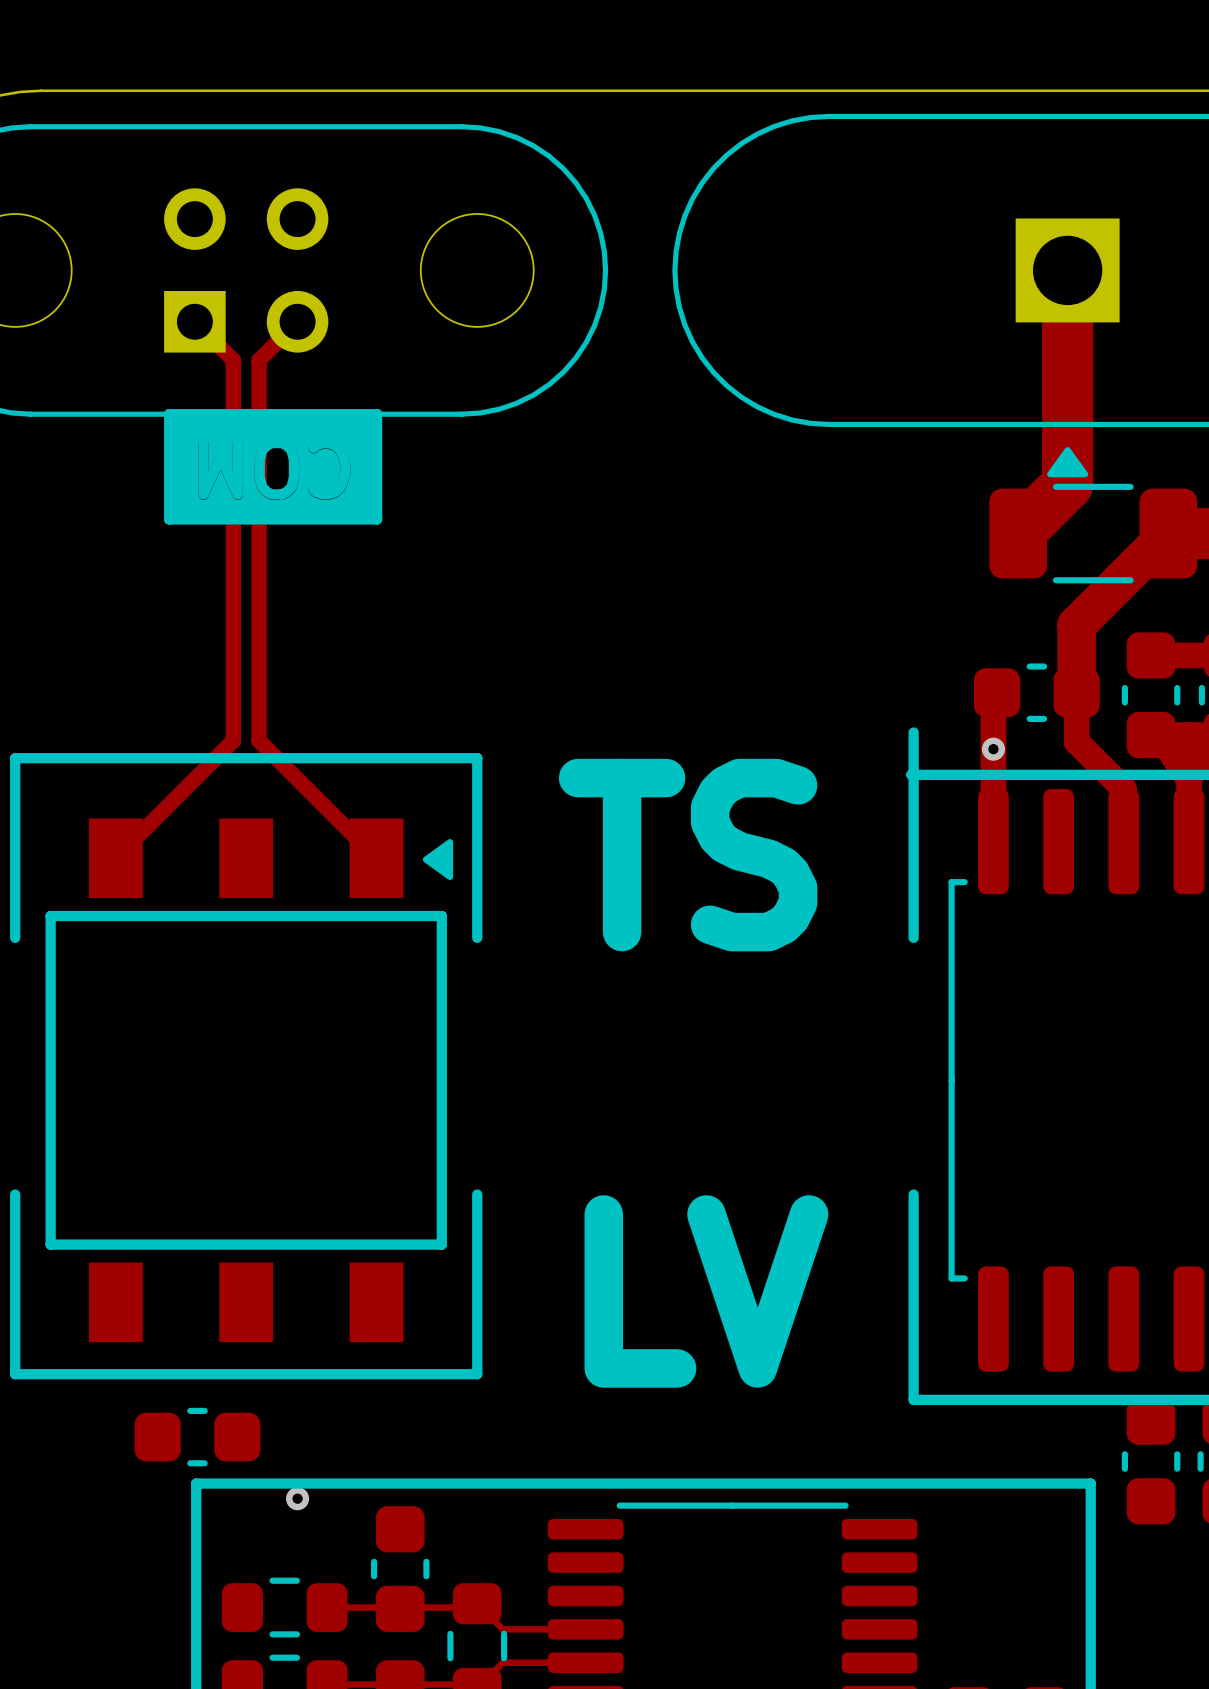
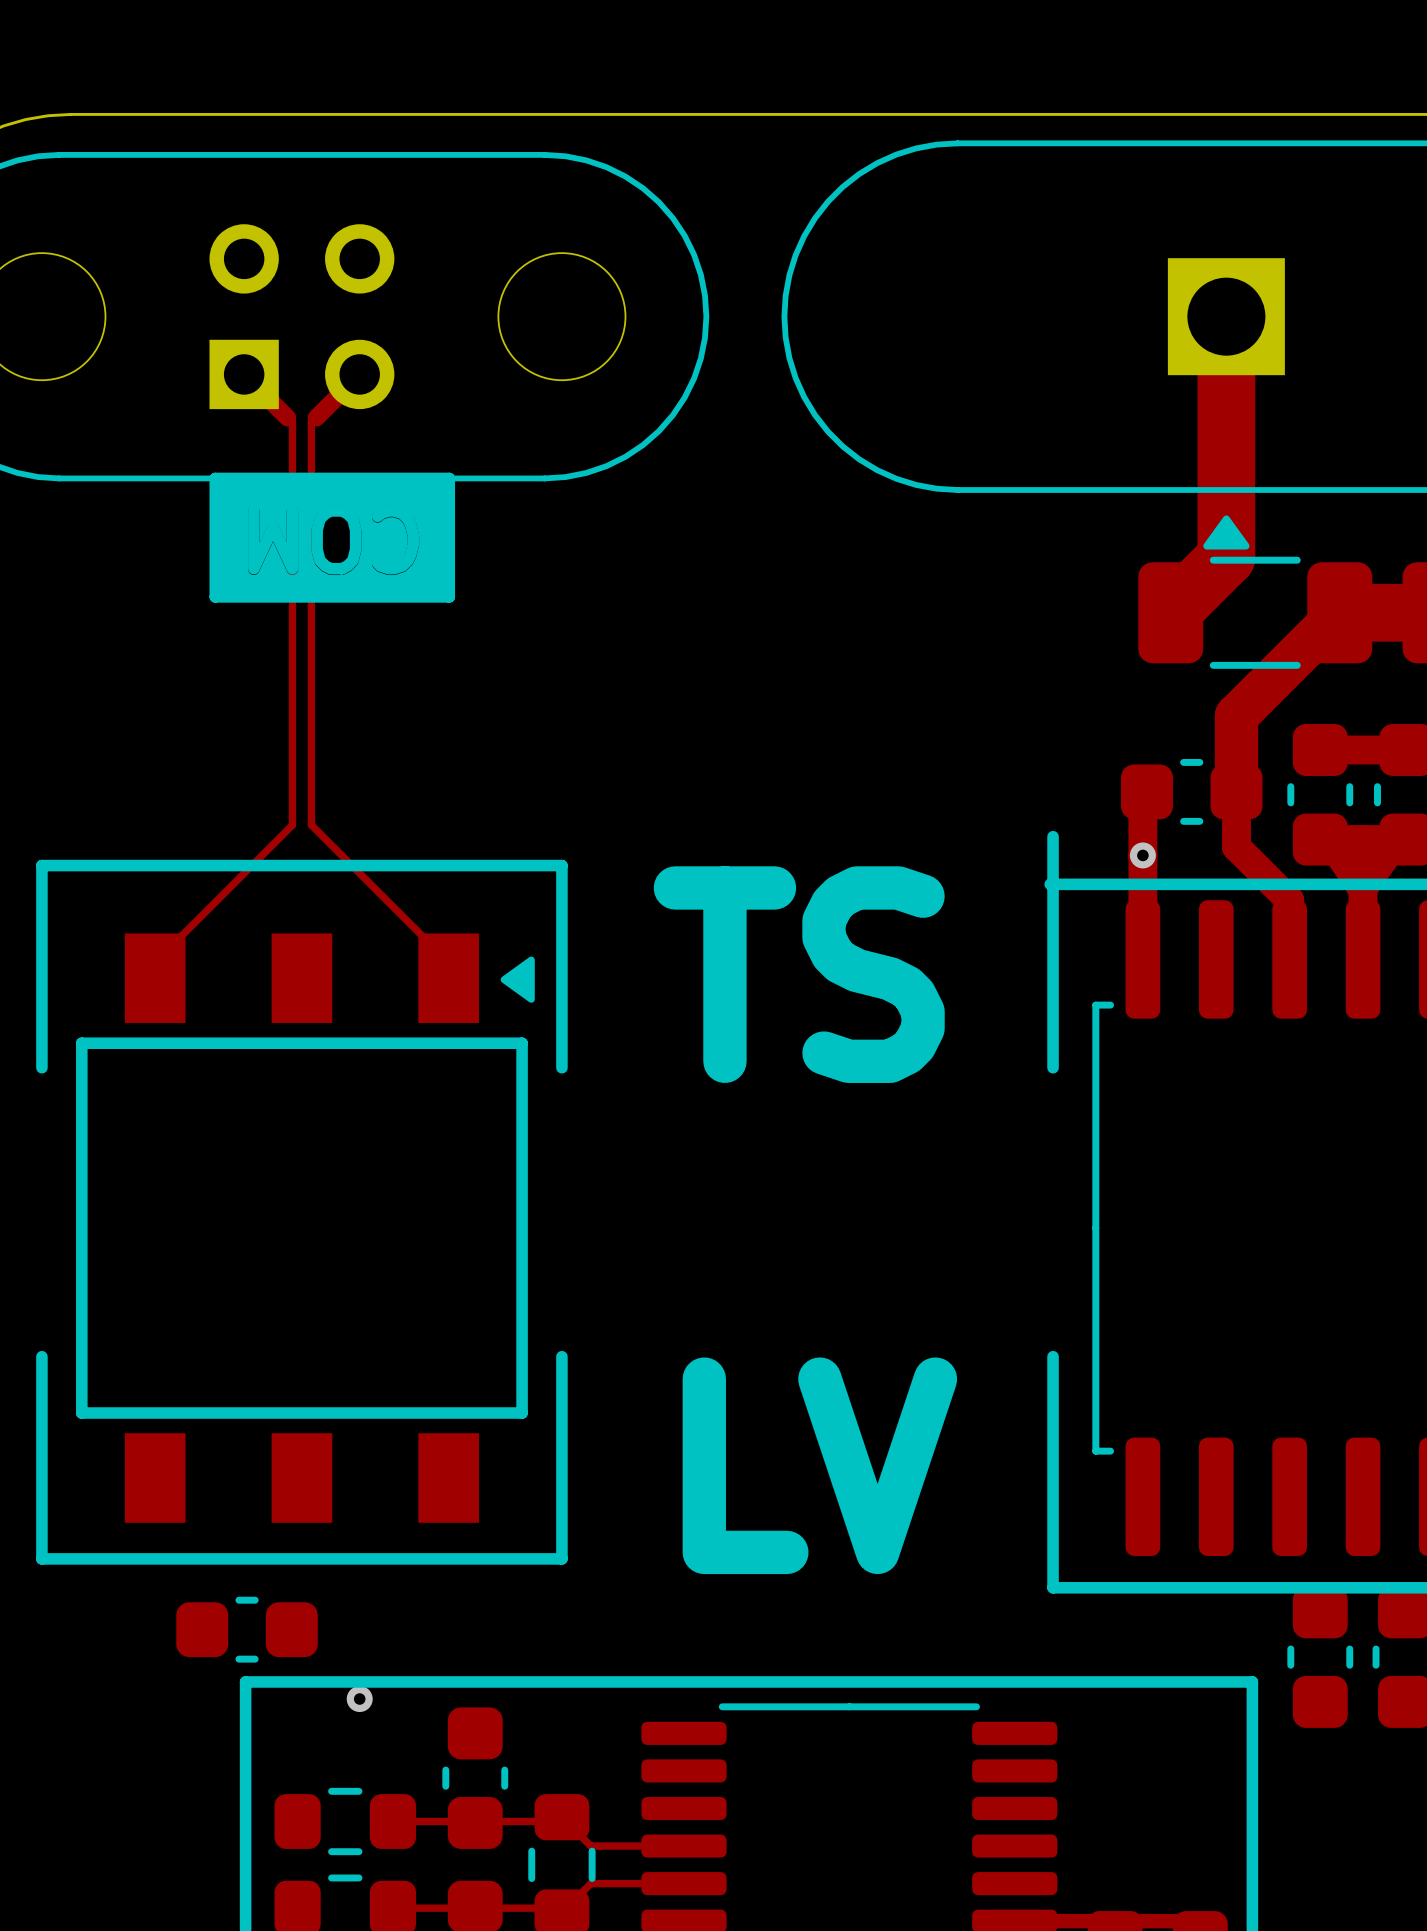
top track: (233, 360) (233, 740) (115, 858) -> (287, 417) (292, 422) (292, 825) (155, 962)
top track: (259, 360) (259, 740) (376, 858) -> (316, 417) (311, 422) (311, 825) (448, 962)

